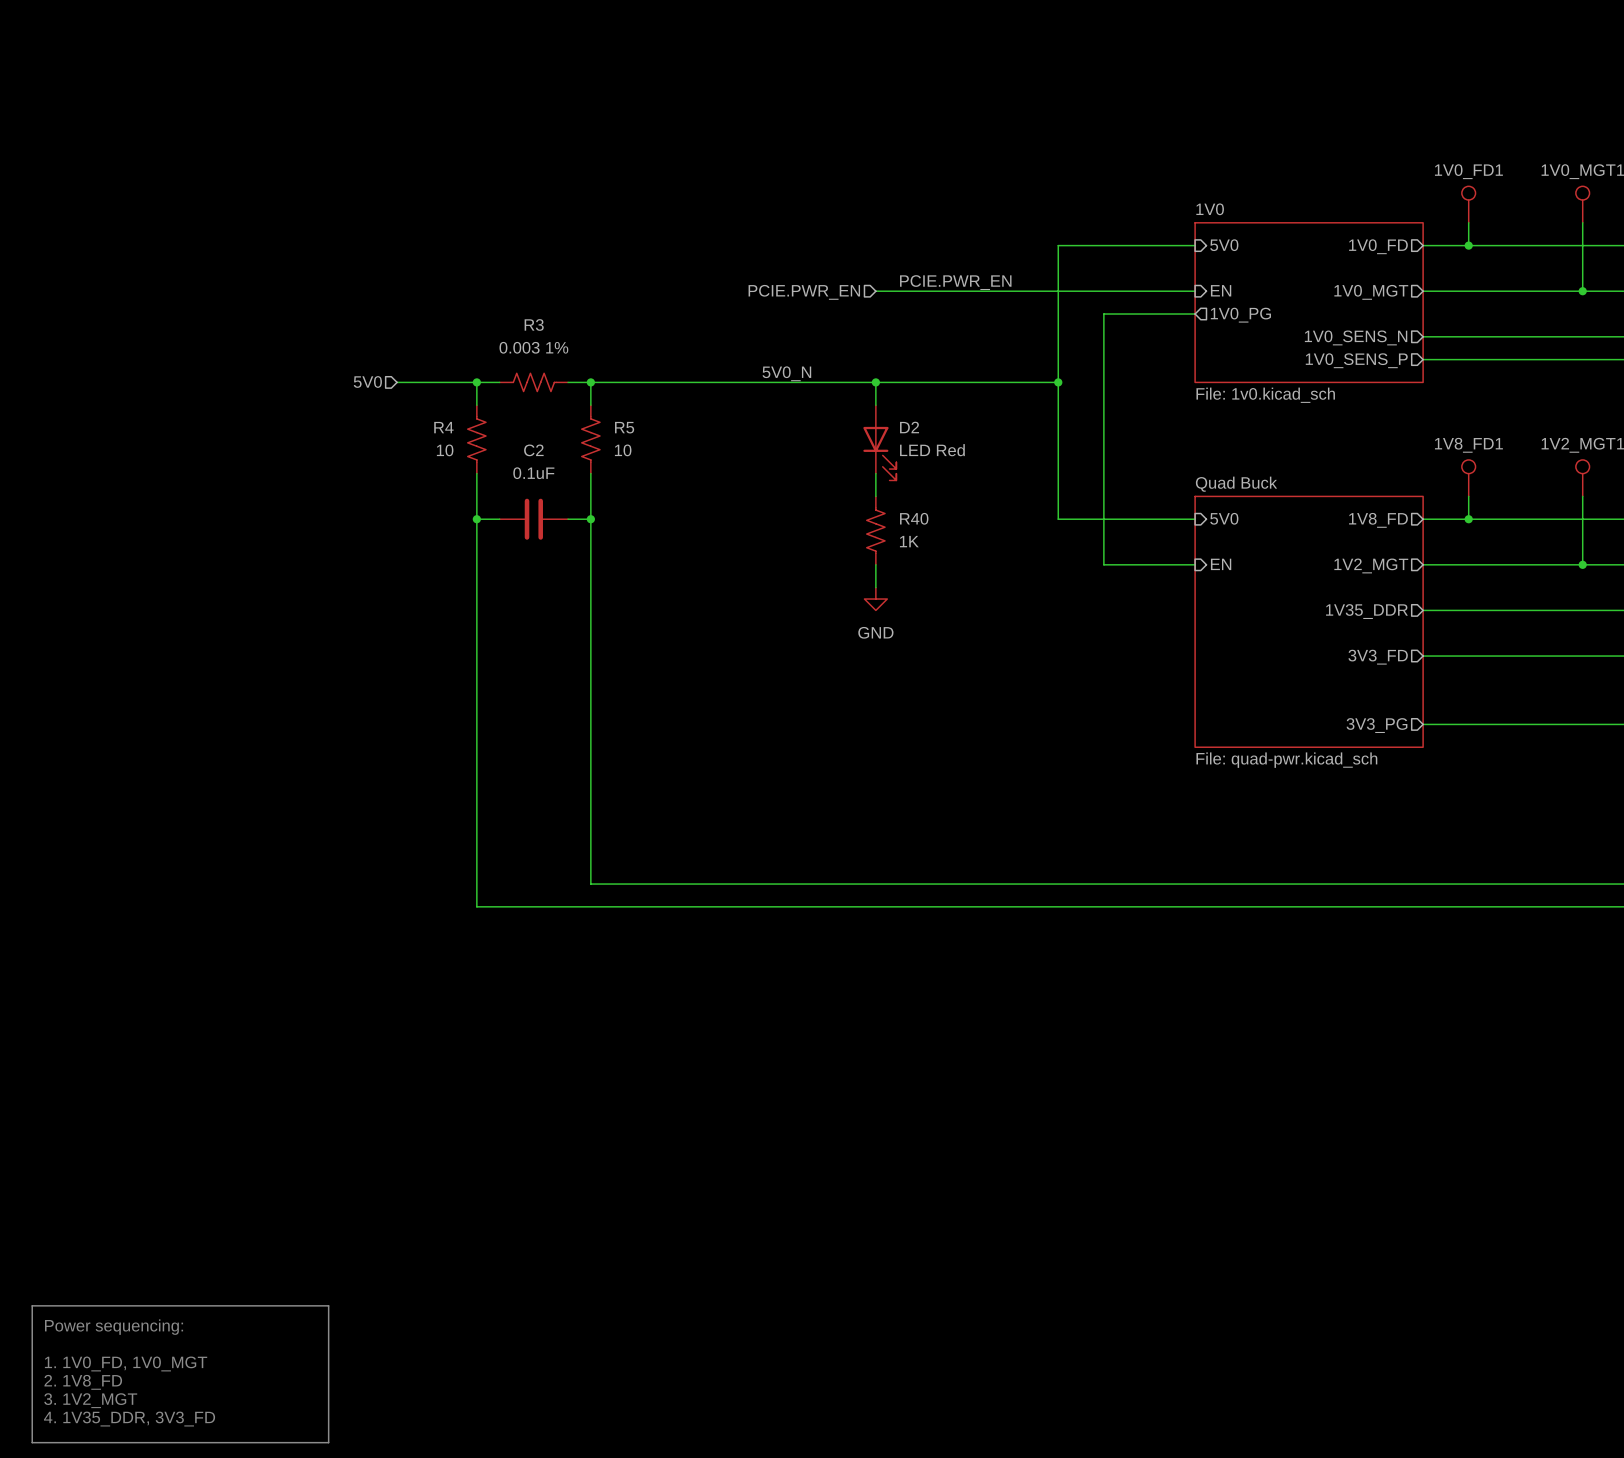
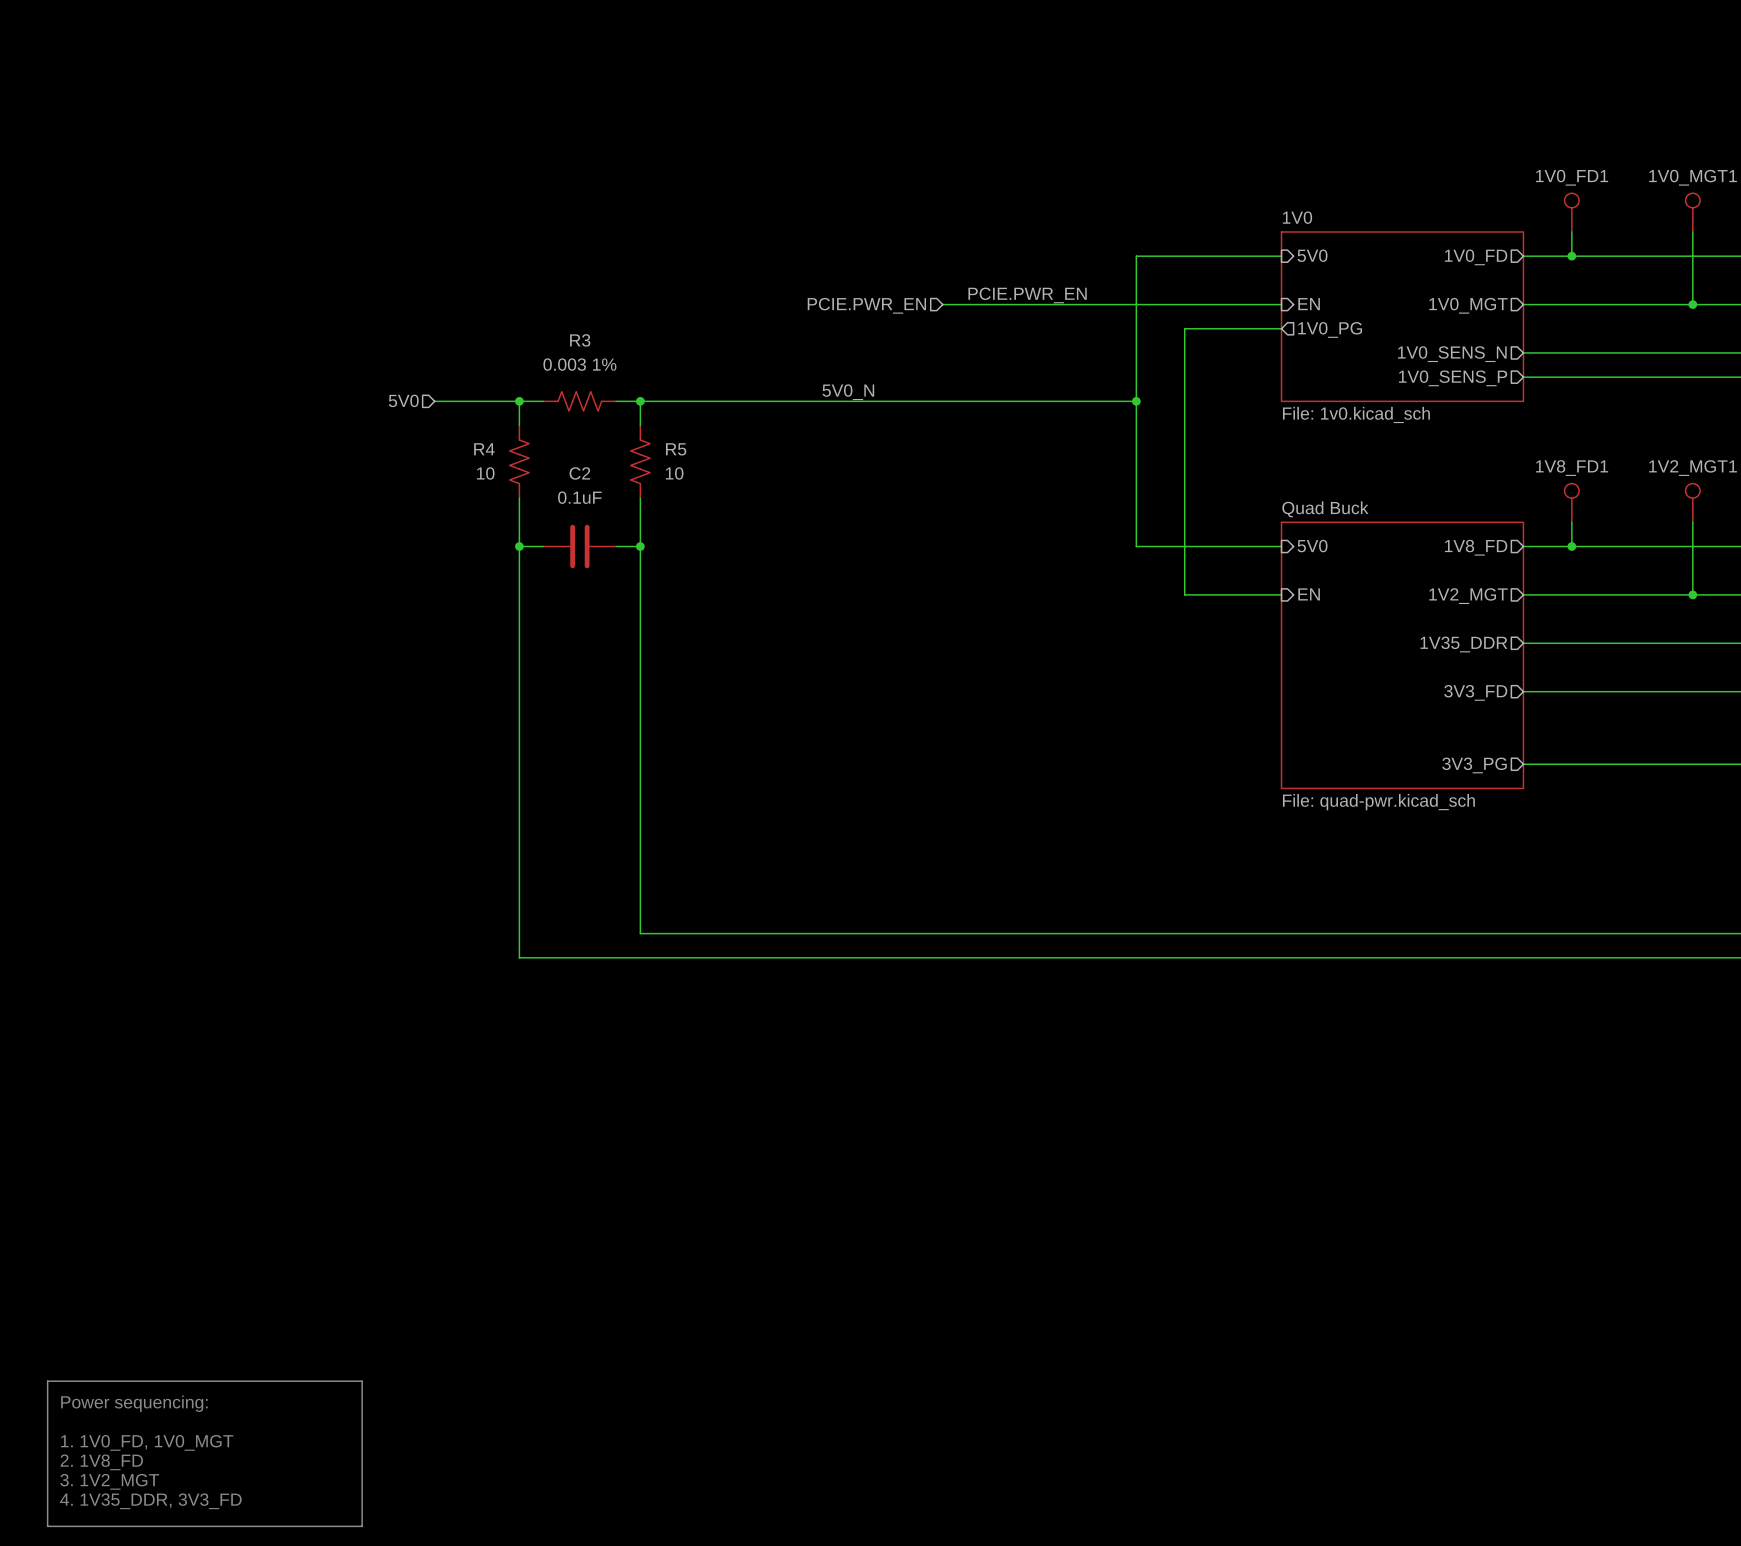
wire: (875, 382) (875, 405) -> none
junction: (875, 382) -> none
D2: LED Red (879, 442) -> none
wire: (875, 473) (875, 496) -> none
R40: 1K (875, 530) -> none
wire: (875, 564) (875, 587) -> none
power symbol: GND (875, 599) -> none

